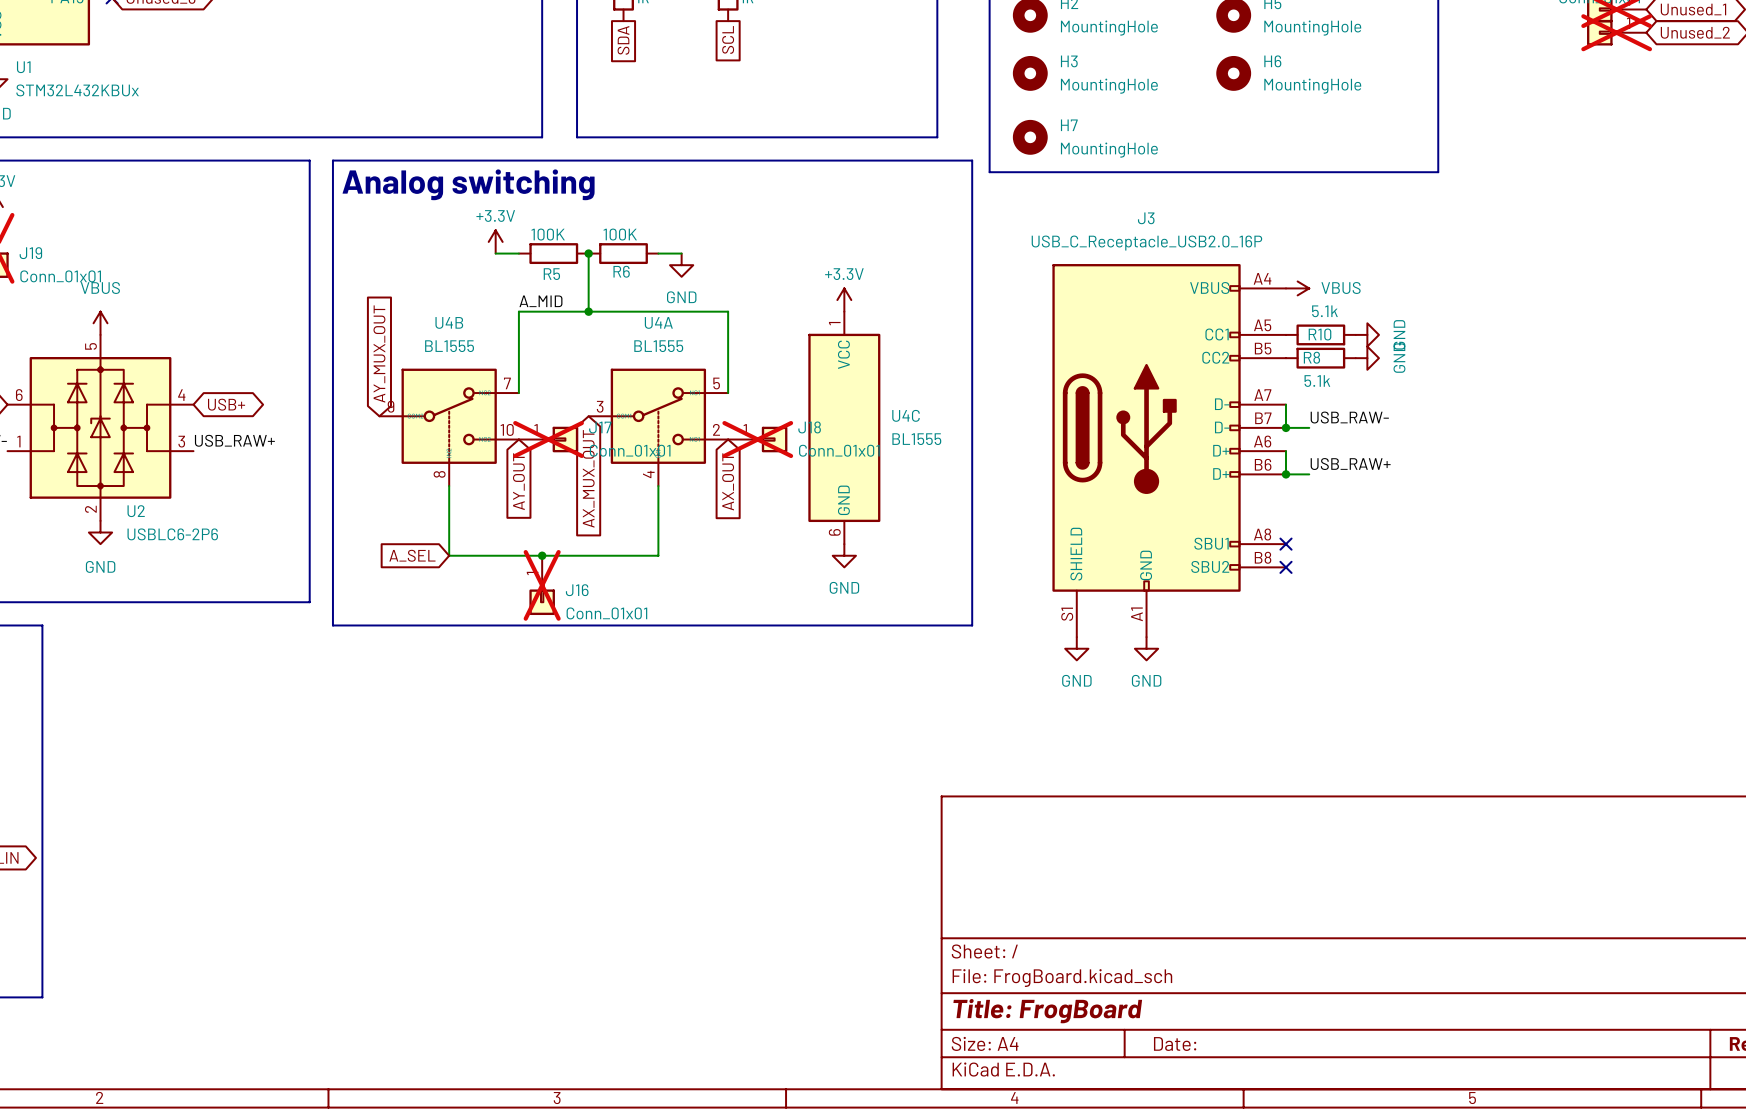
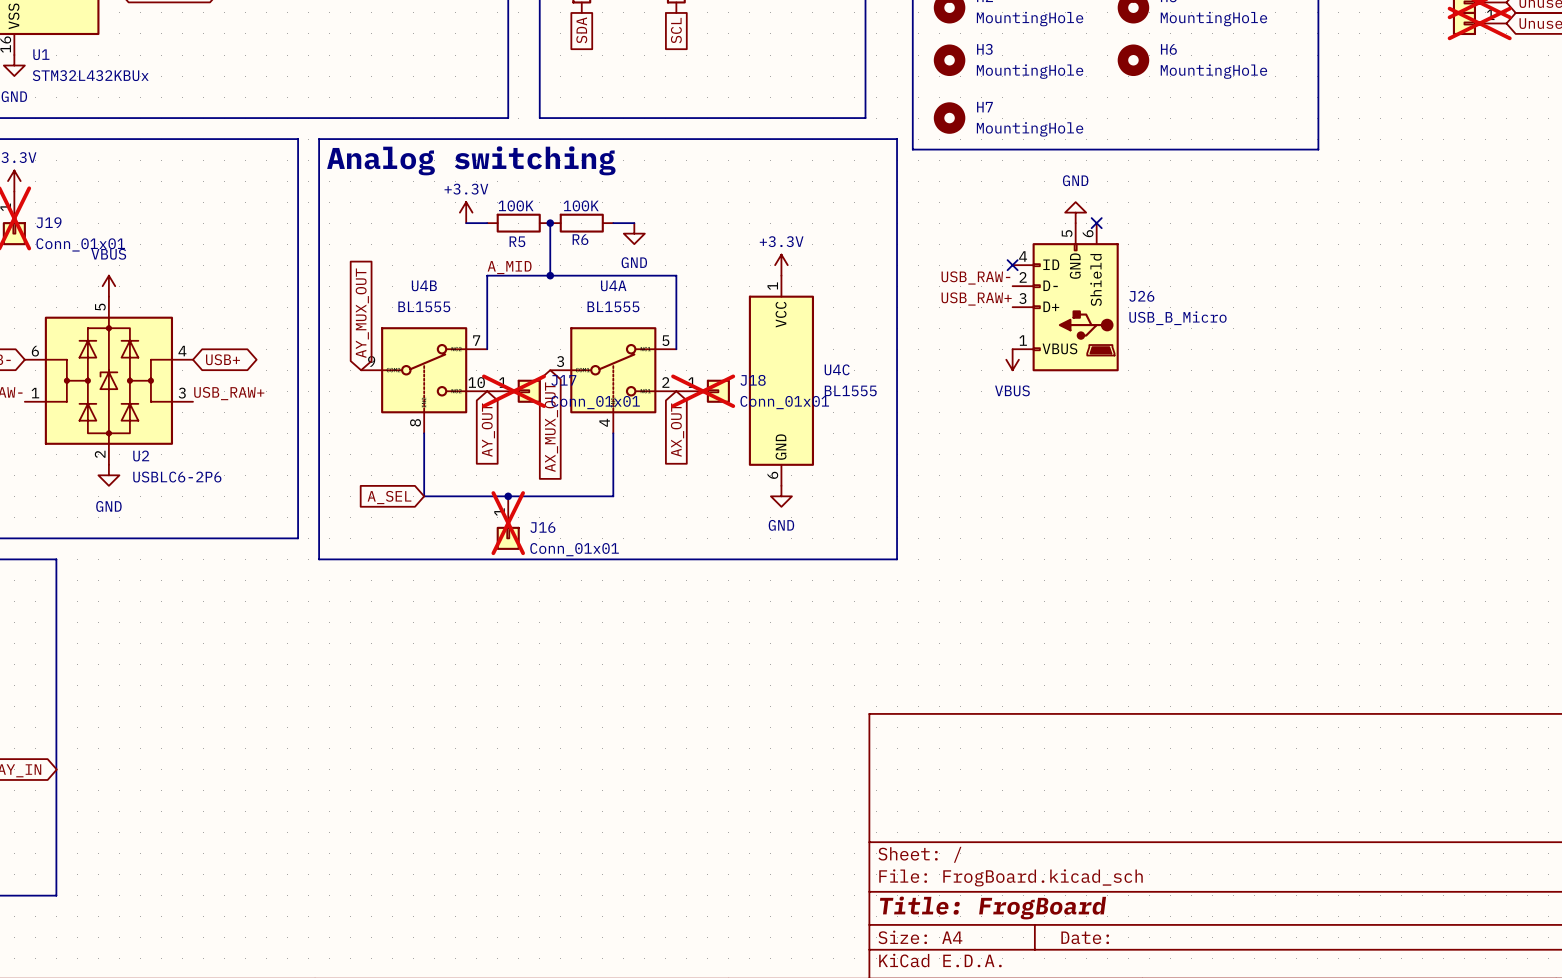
power symbol: none -> GND (1075, 212)
no-connect mark: none -> (1096, 223)
power symbol: VBUS (1297, 288) -> none
no-connect mark: none -> (1012, 265)
label: none -> USB_RAW- (975, 277)
R10: 5.1k (1320, 334) -> none
power symbol: GND (1367, 334) -> none
J26: none -> USB_B_Micro (1065, 297)
label: none -> USB_RAW+ (976, 299)
R8: 5.1k (1320, 358) -> none
power symbol: GND (1367, 358) -> none
power symbol: none -> VBUS (1012, 359)
wire: (1286, 404) (1286, 427) (1309, 427) -> none
label: USB_RAW- (1349, 417) -> none
junction: (1286, 427) -> none
J3: USB_C_Receptacle_USB2.0_16P (1169, 450) -> none
wire: (1286, 451) (1286, 474) (1309, 474) -> none
label: USB_RAW+ (1350, 464) -> none
junction: (1286, 474) -> none
no-connect mark: (1286, 544) -> none
no-connect mark: (1286, 567) -> none
power symbol: GND (1076, 648) -> none
power symbol: GND (1146, 648) -> none

